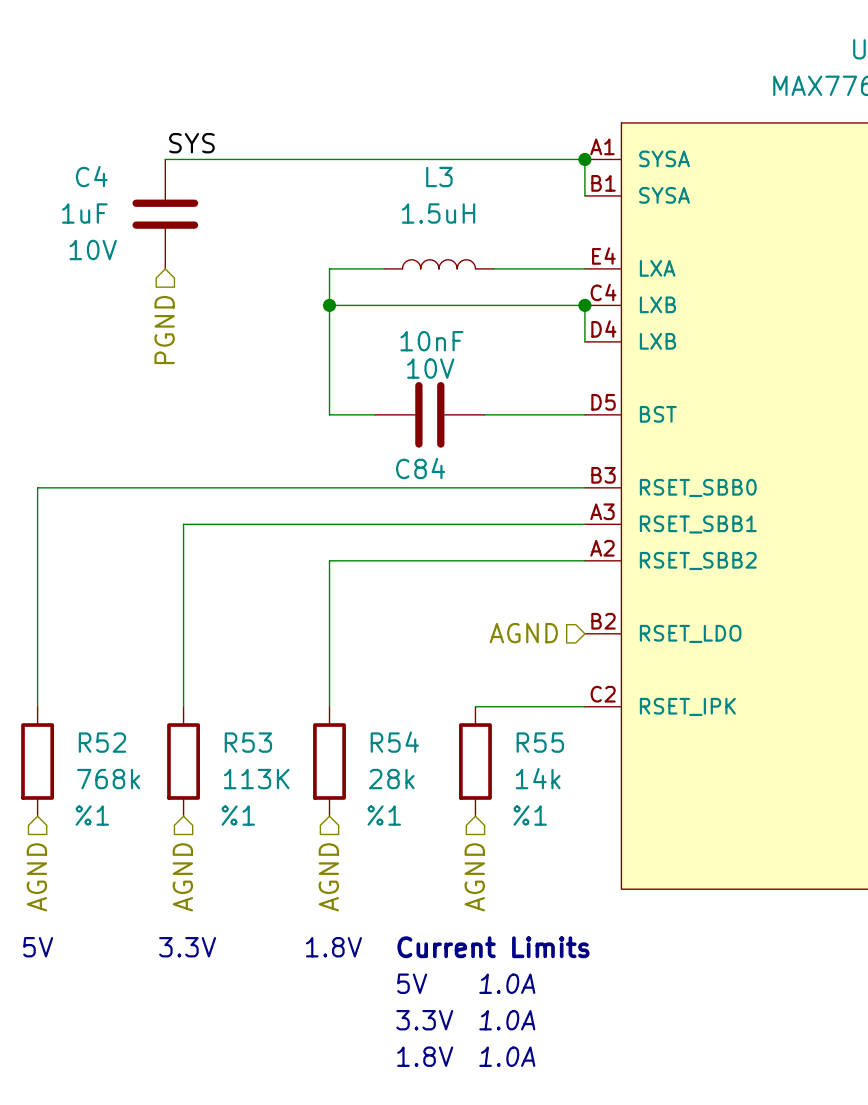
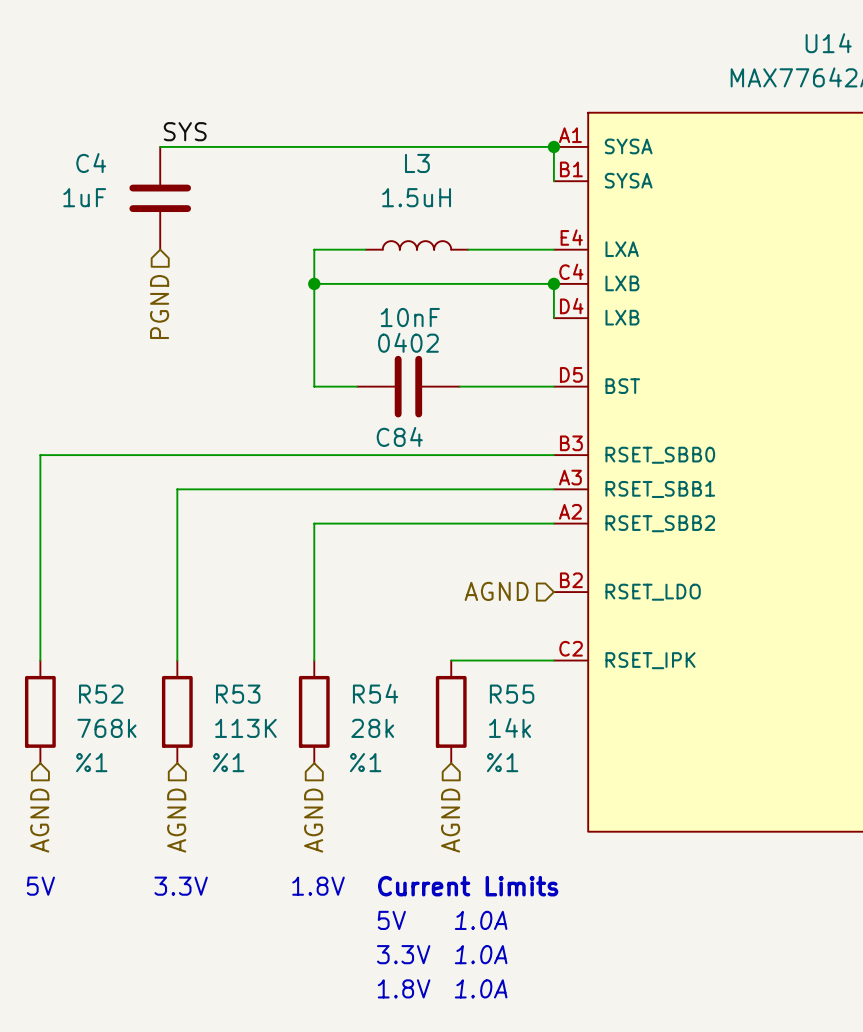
C4 text: 10V (93, 249) -> none
C84 text: 10V (430, 368) -> 0402 (408, 342)

